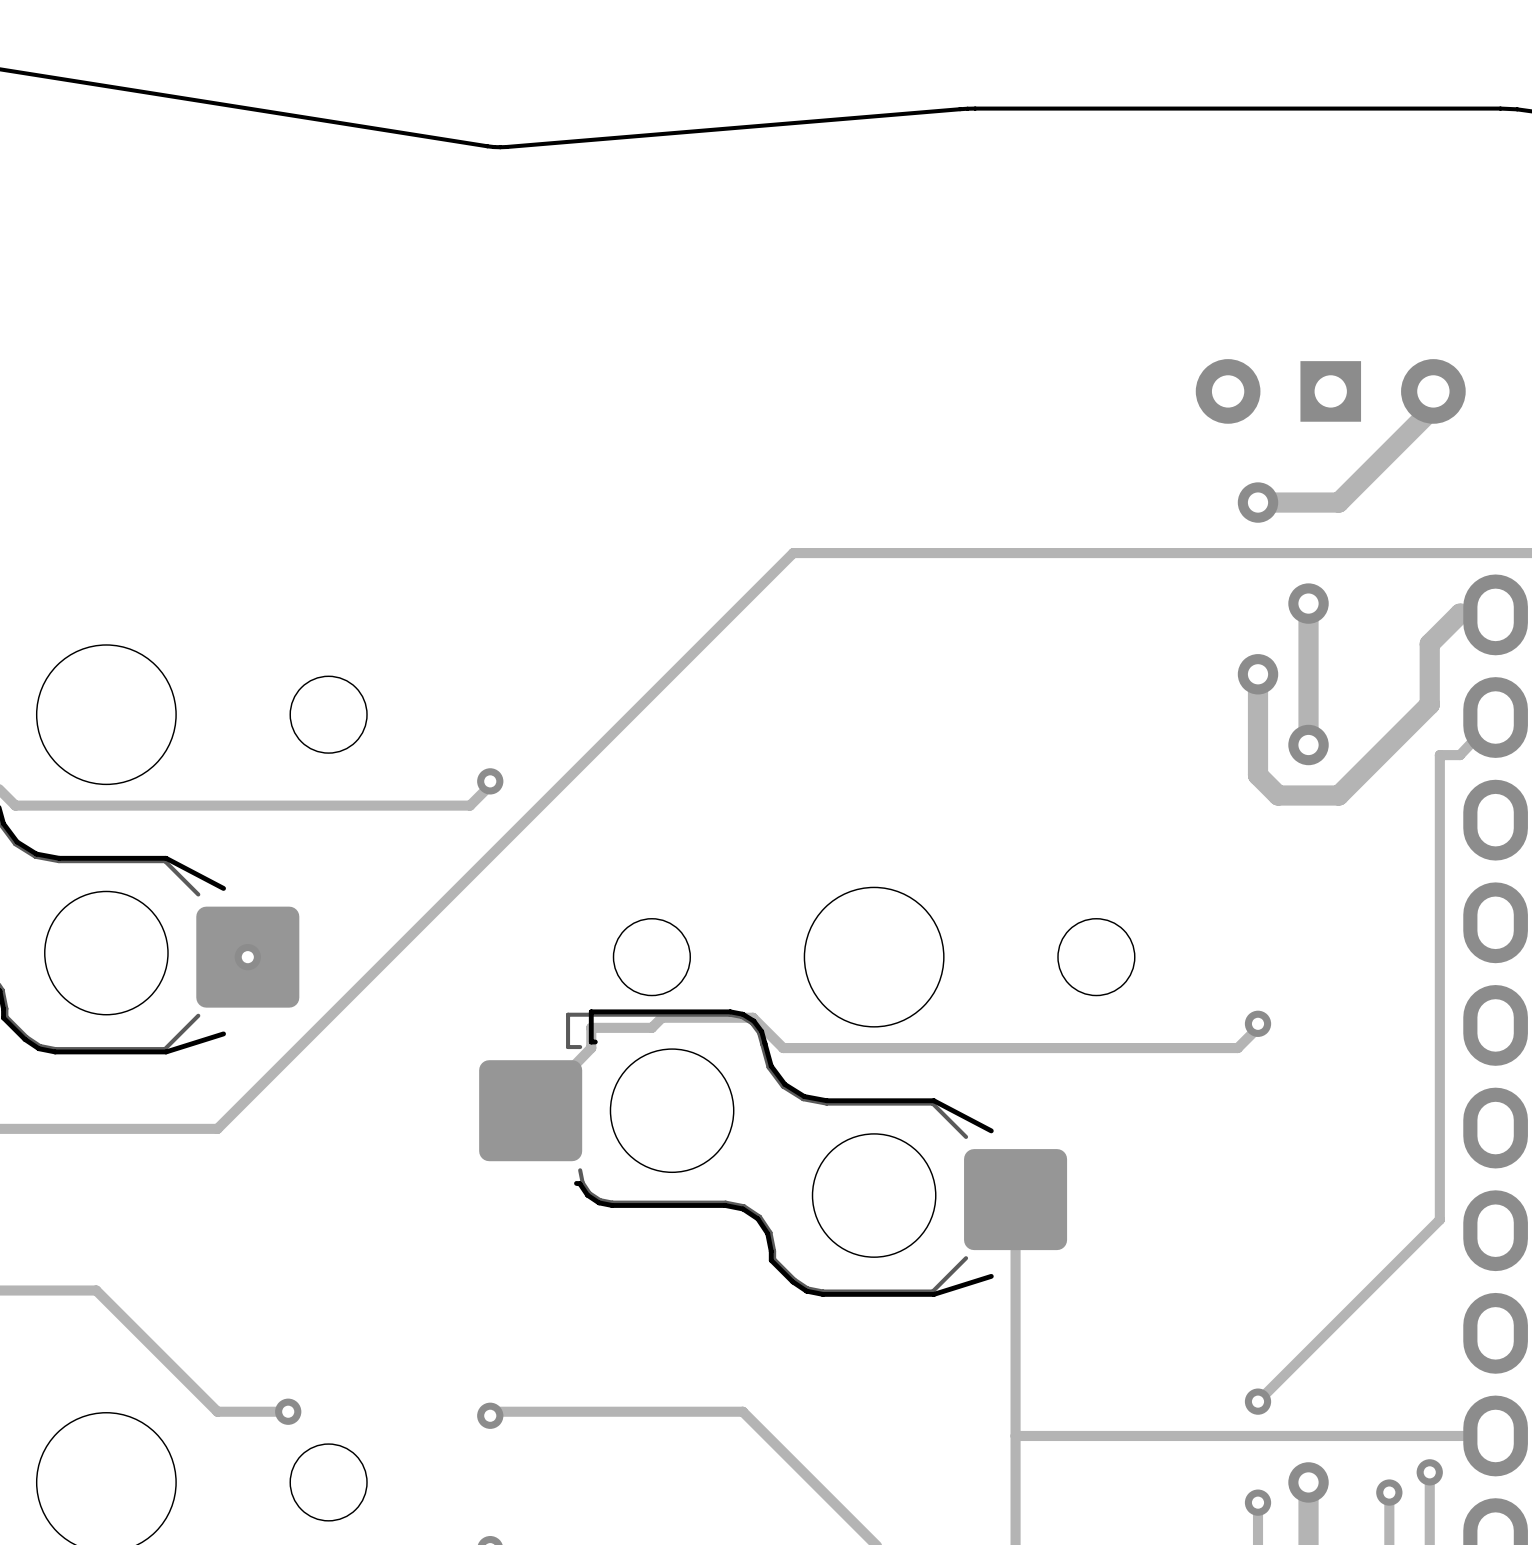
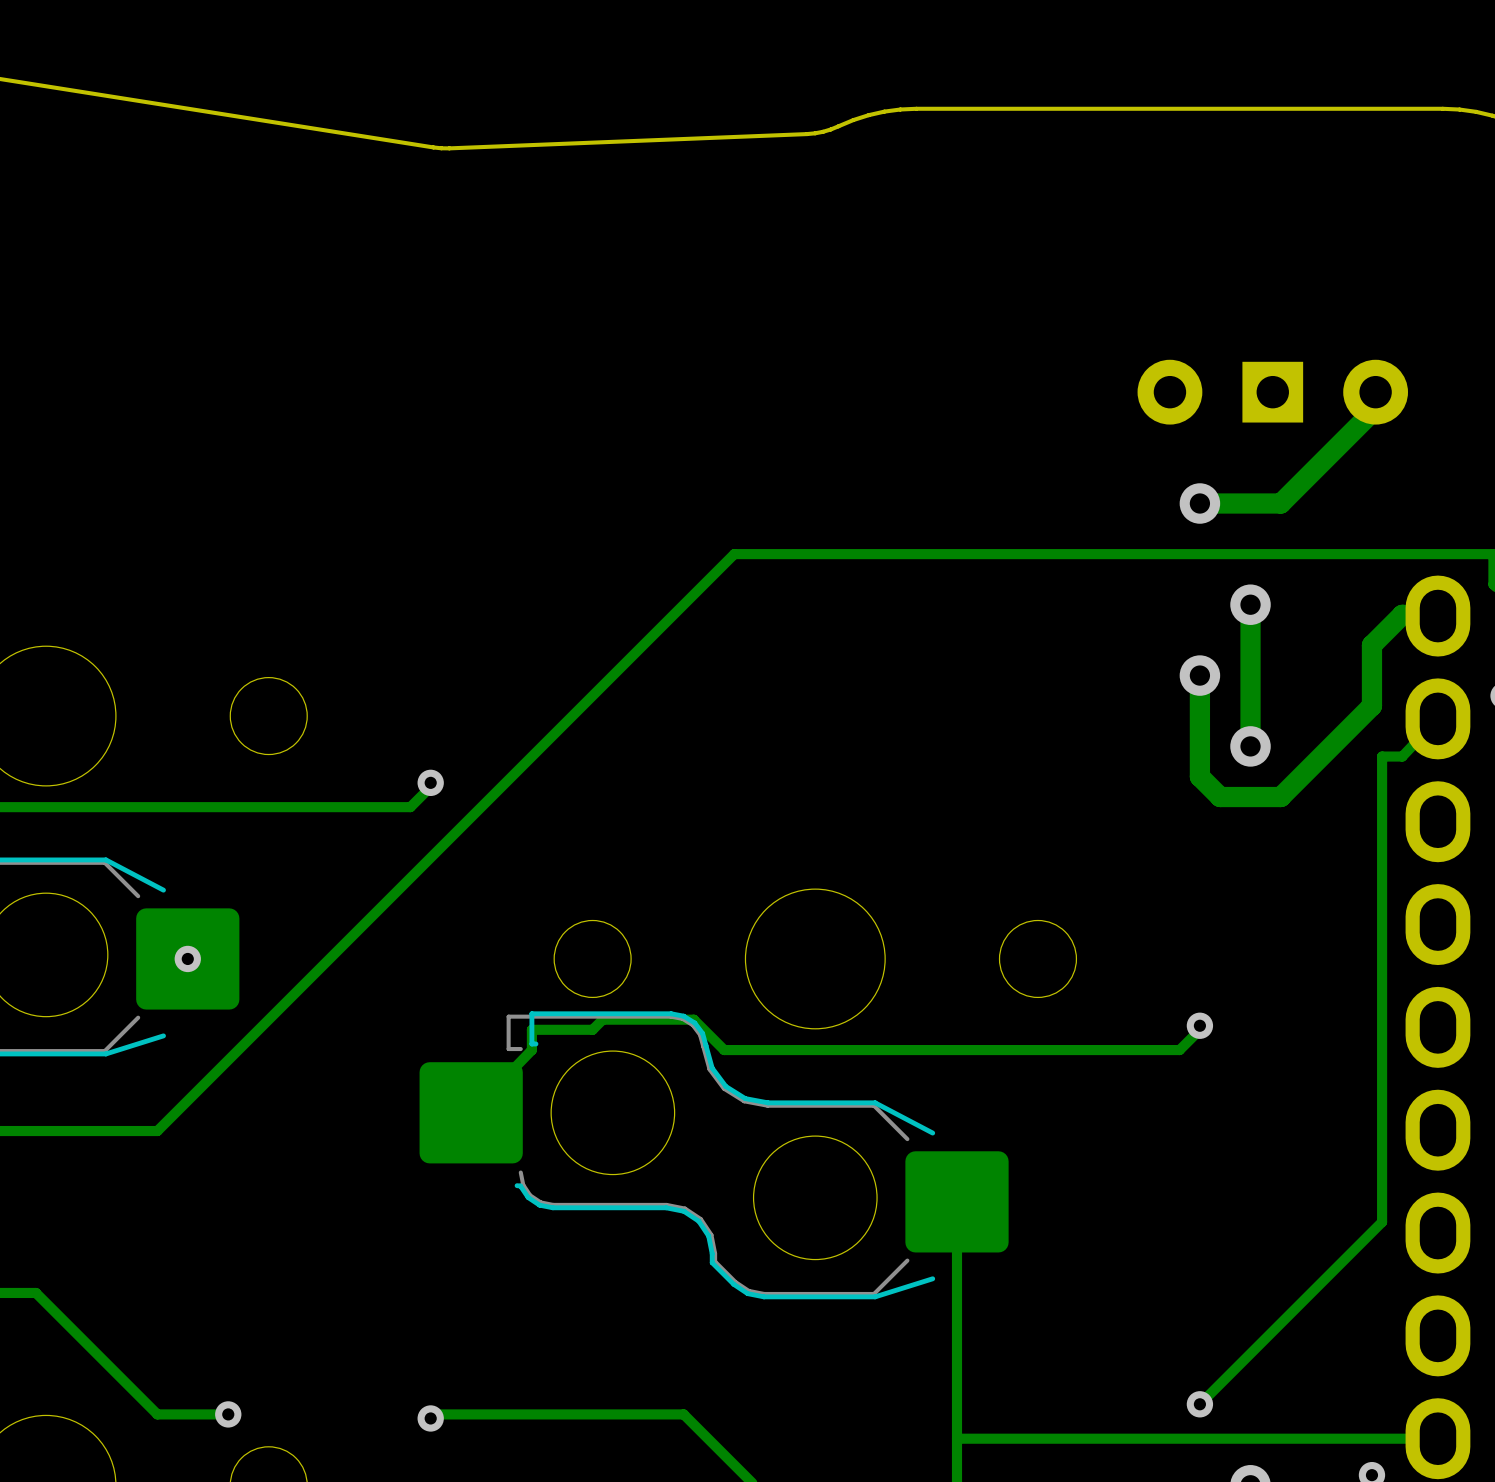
board edge: (975, 108) (506, 147) (487, 146) -> (916, 108) (868, 115) (830, 129) (807, 134) (449, 148) (427, 146)

